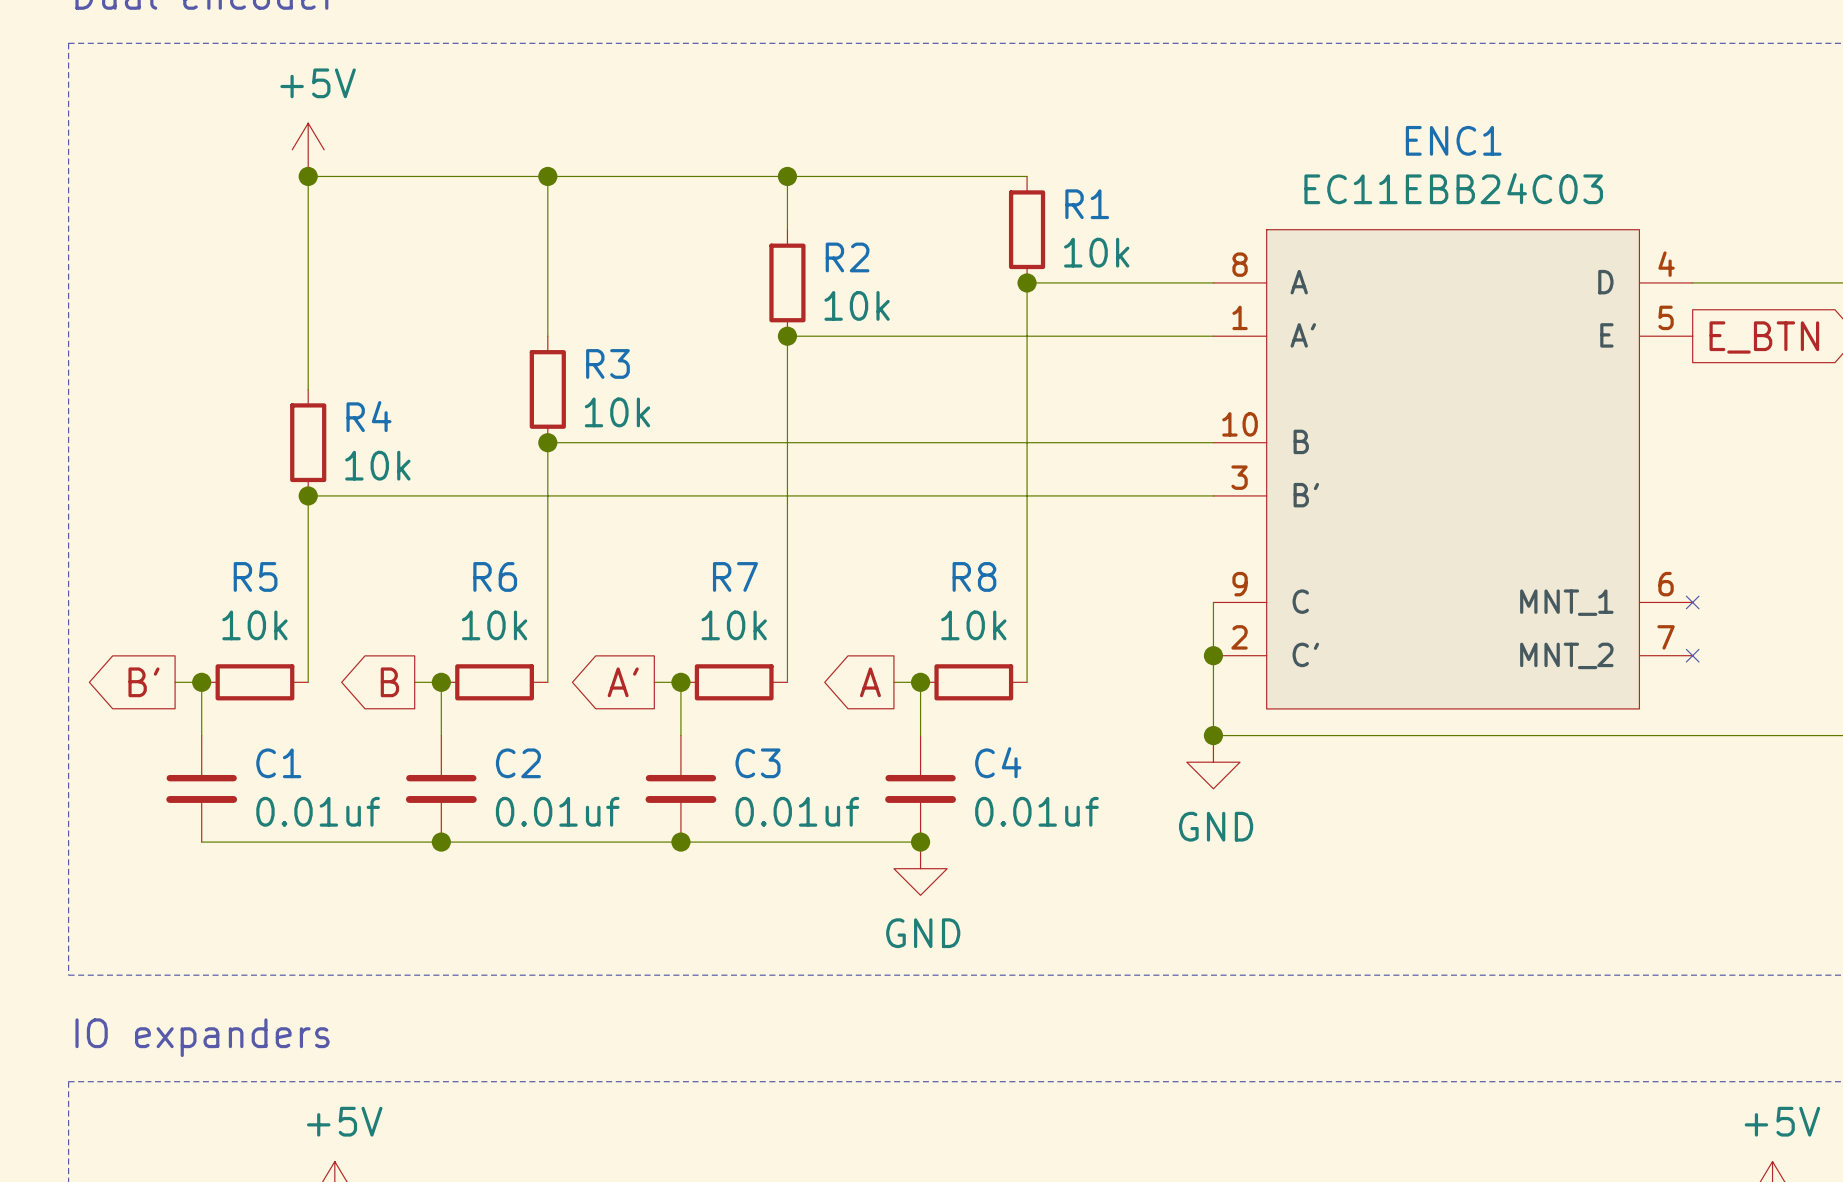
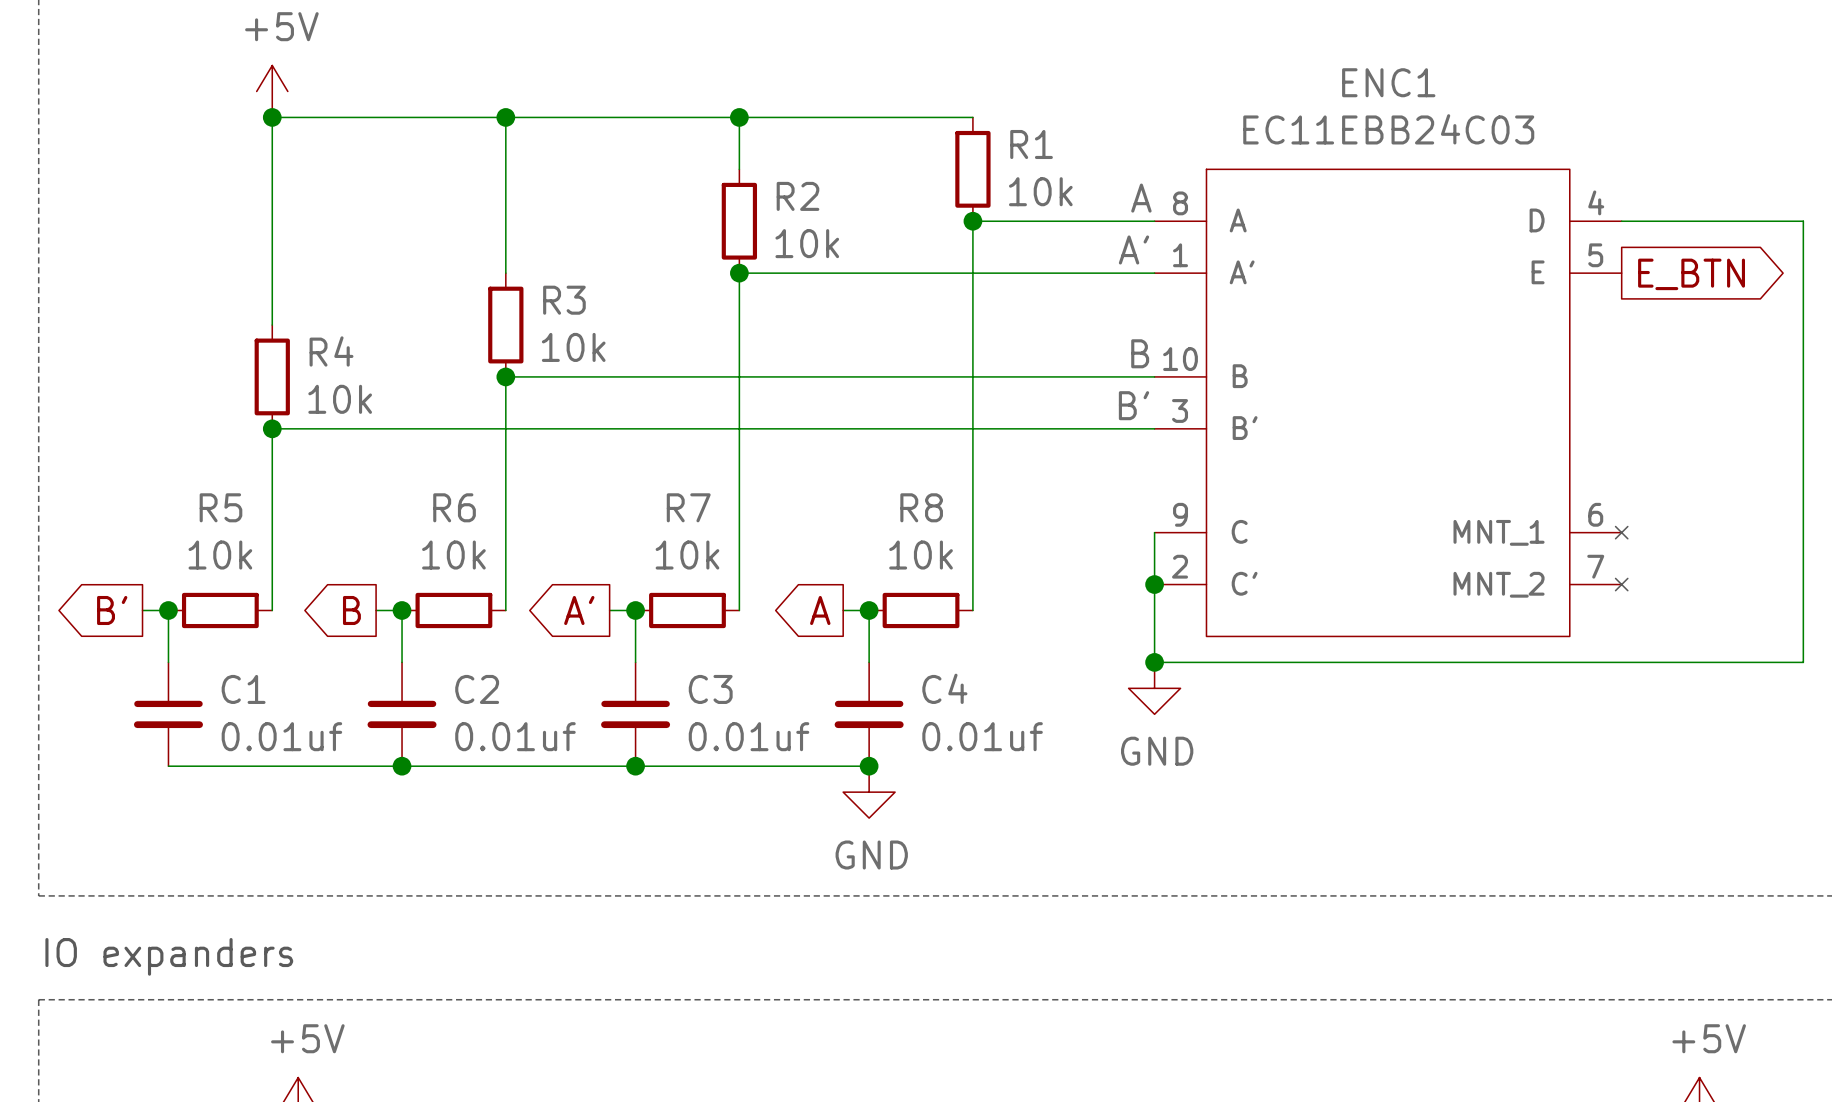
label: none -> A (1141, 198)
label: none -> A' (1133, 249)
label: none -> B (1140, 353)
label: none -> B' (1133, 405)

